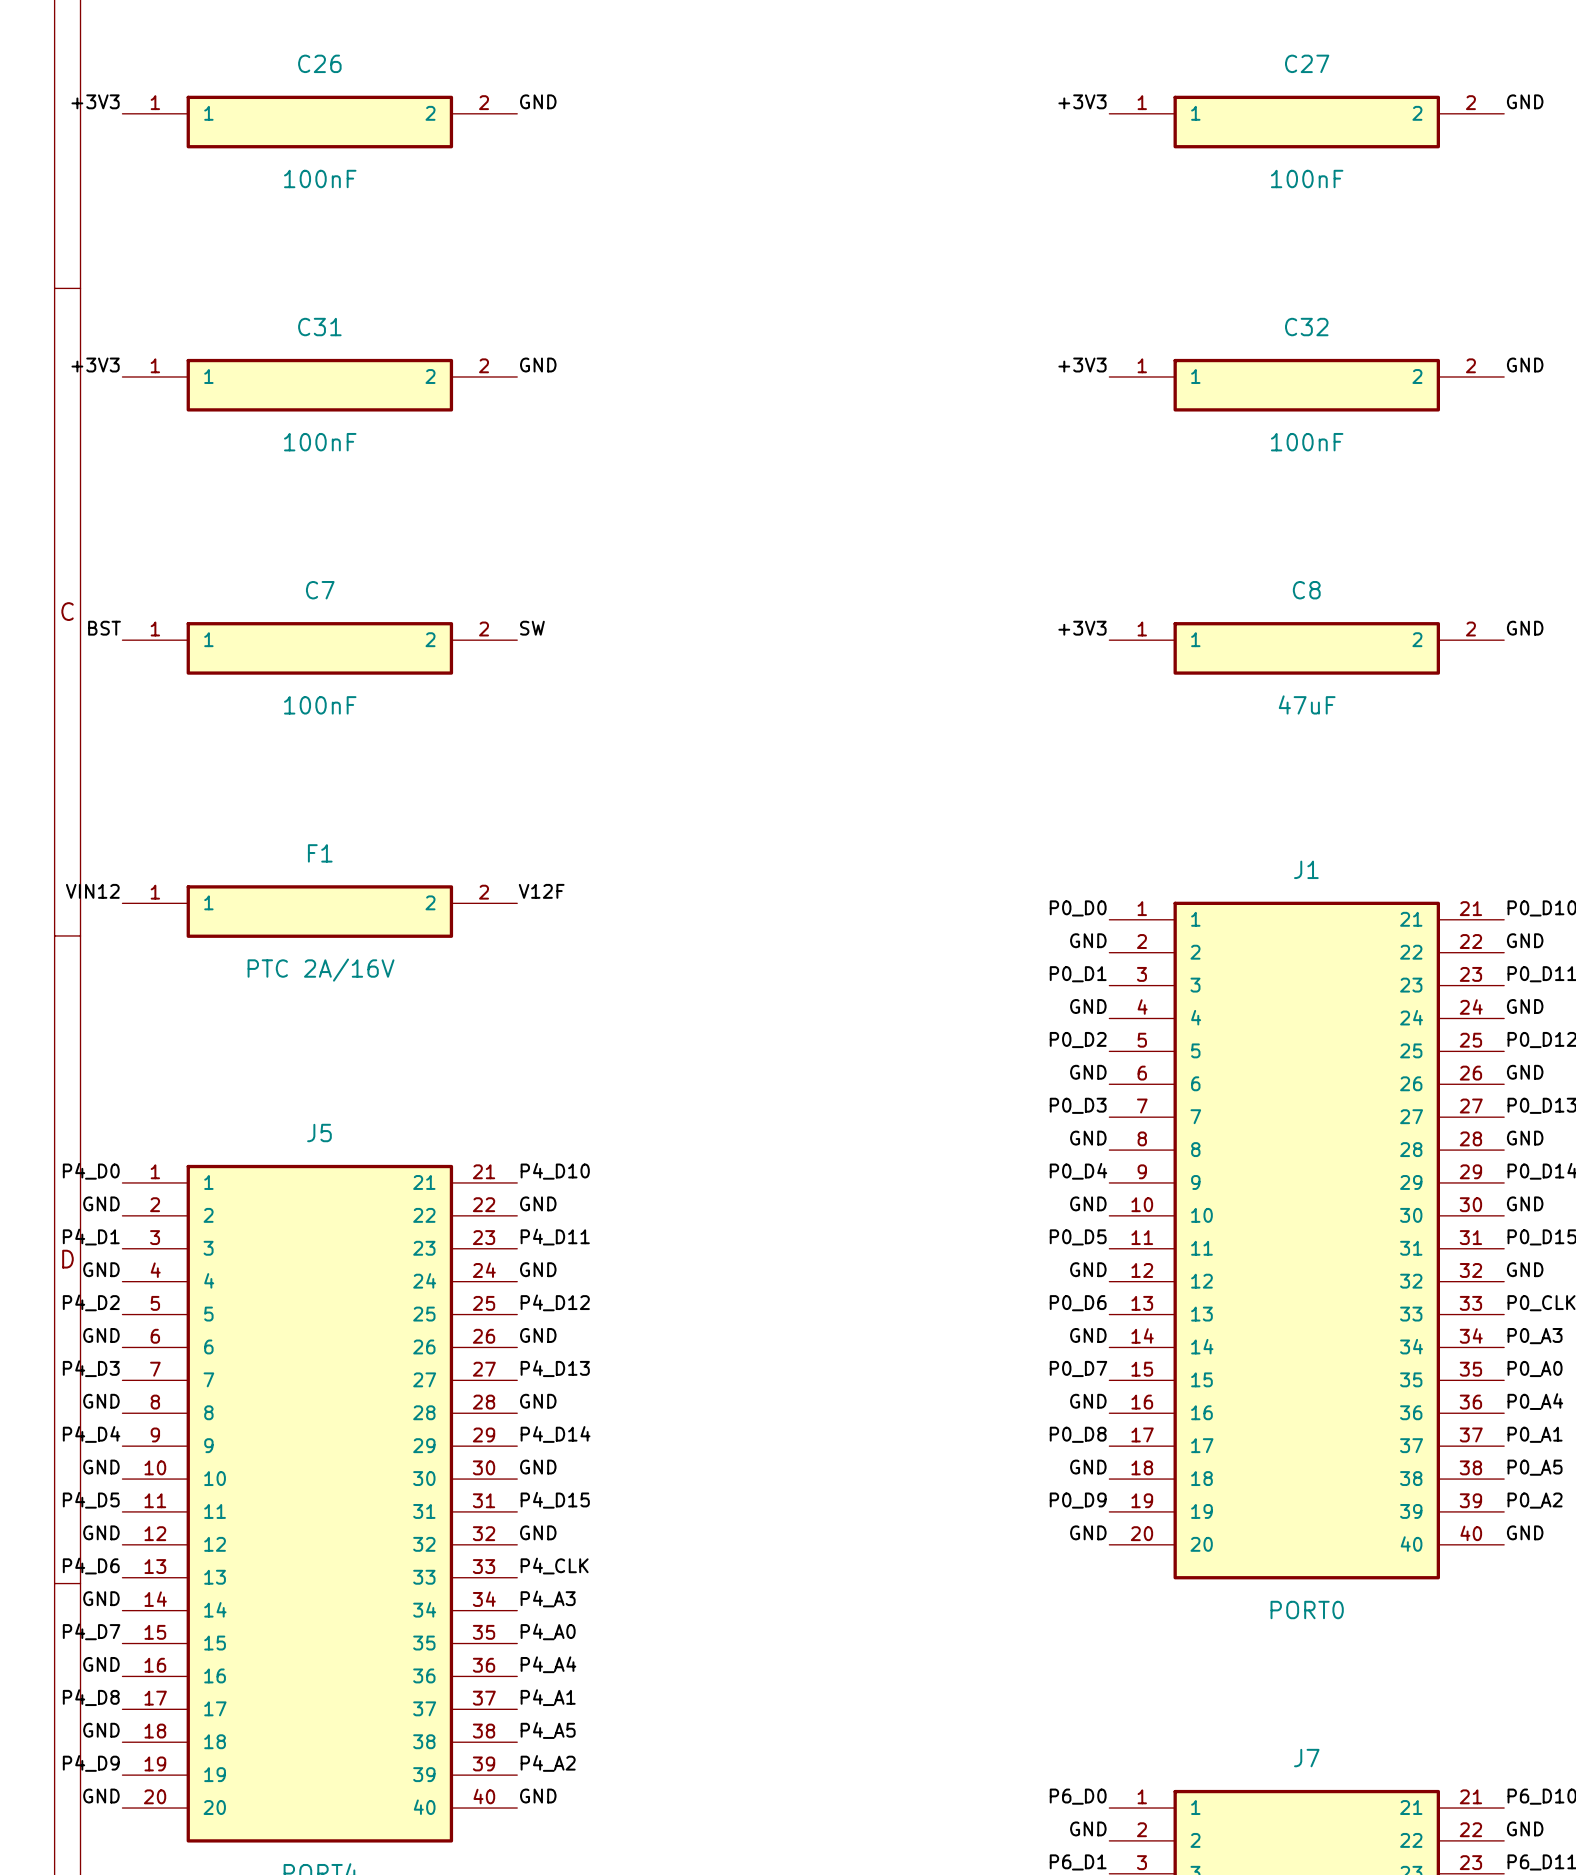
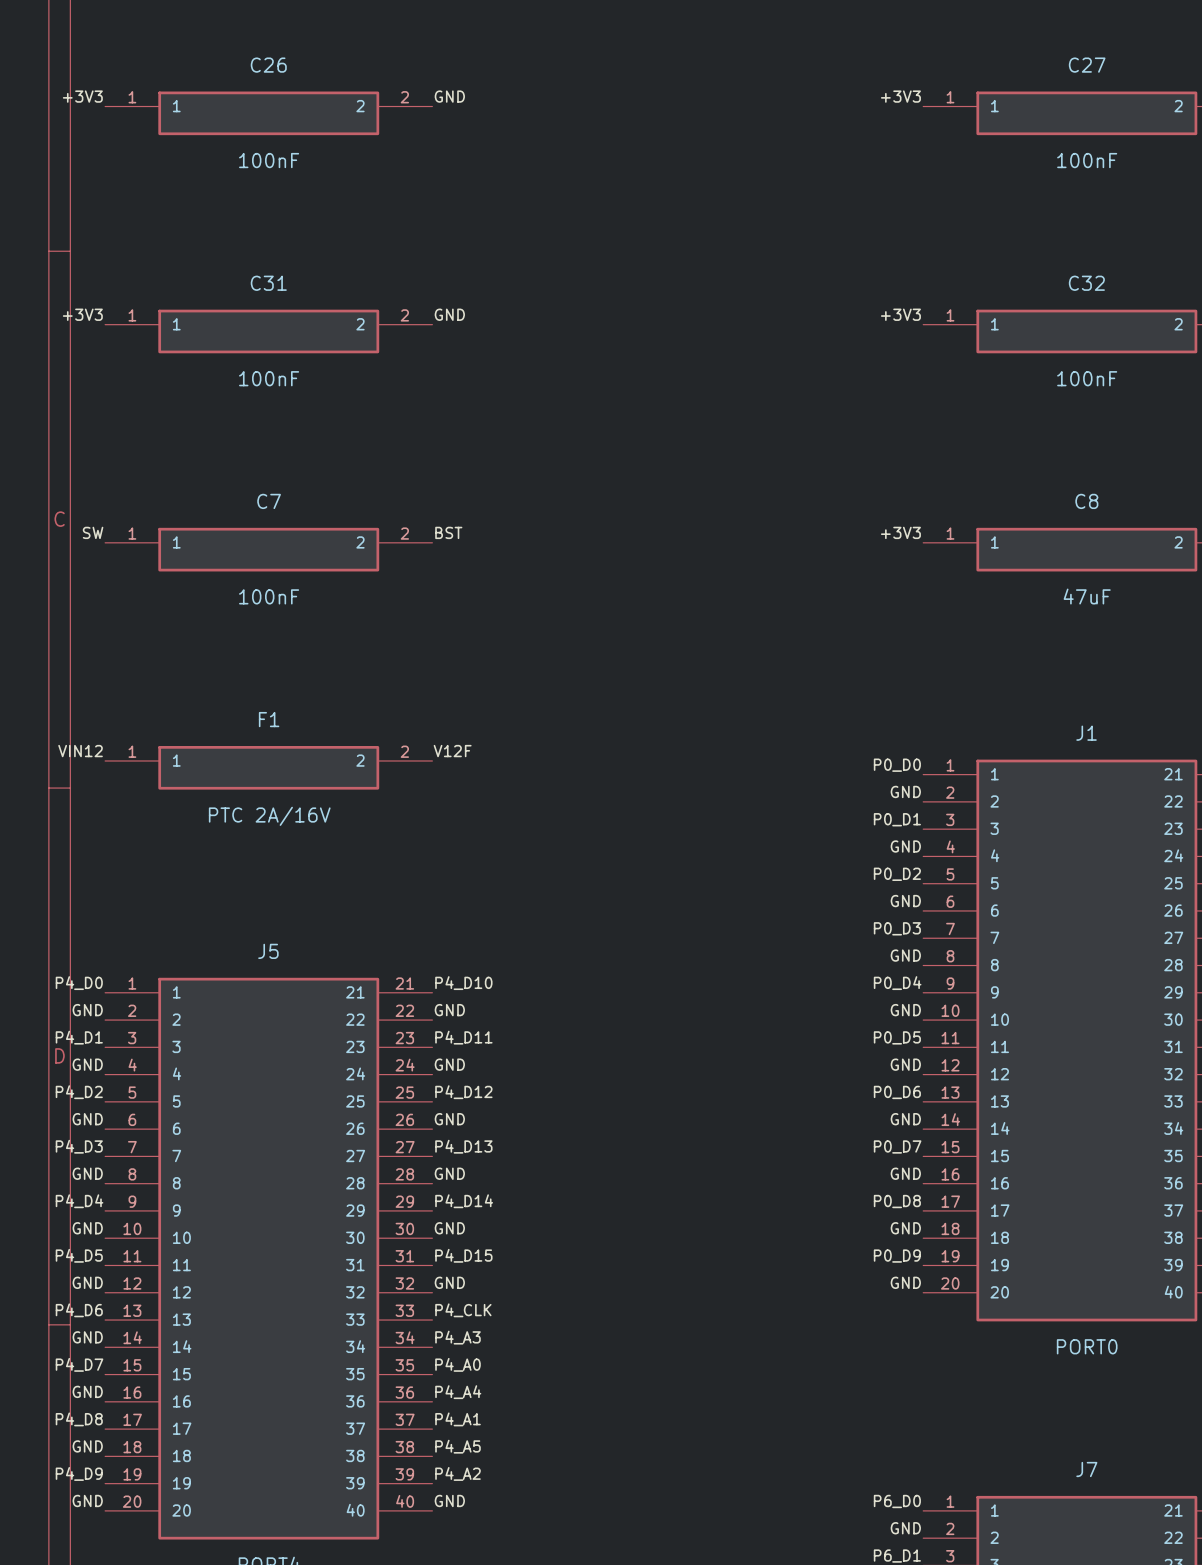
label: BST (104, 628) -> SW (93, 532)
label: SW (532, 628) -> BST (448, 532)

